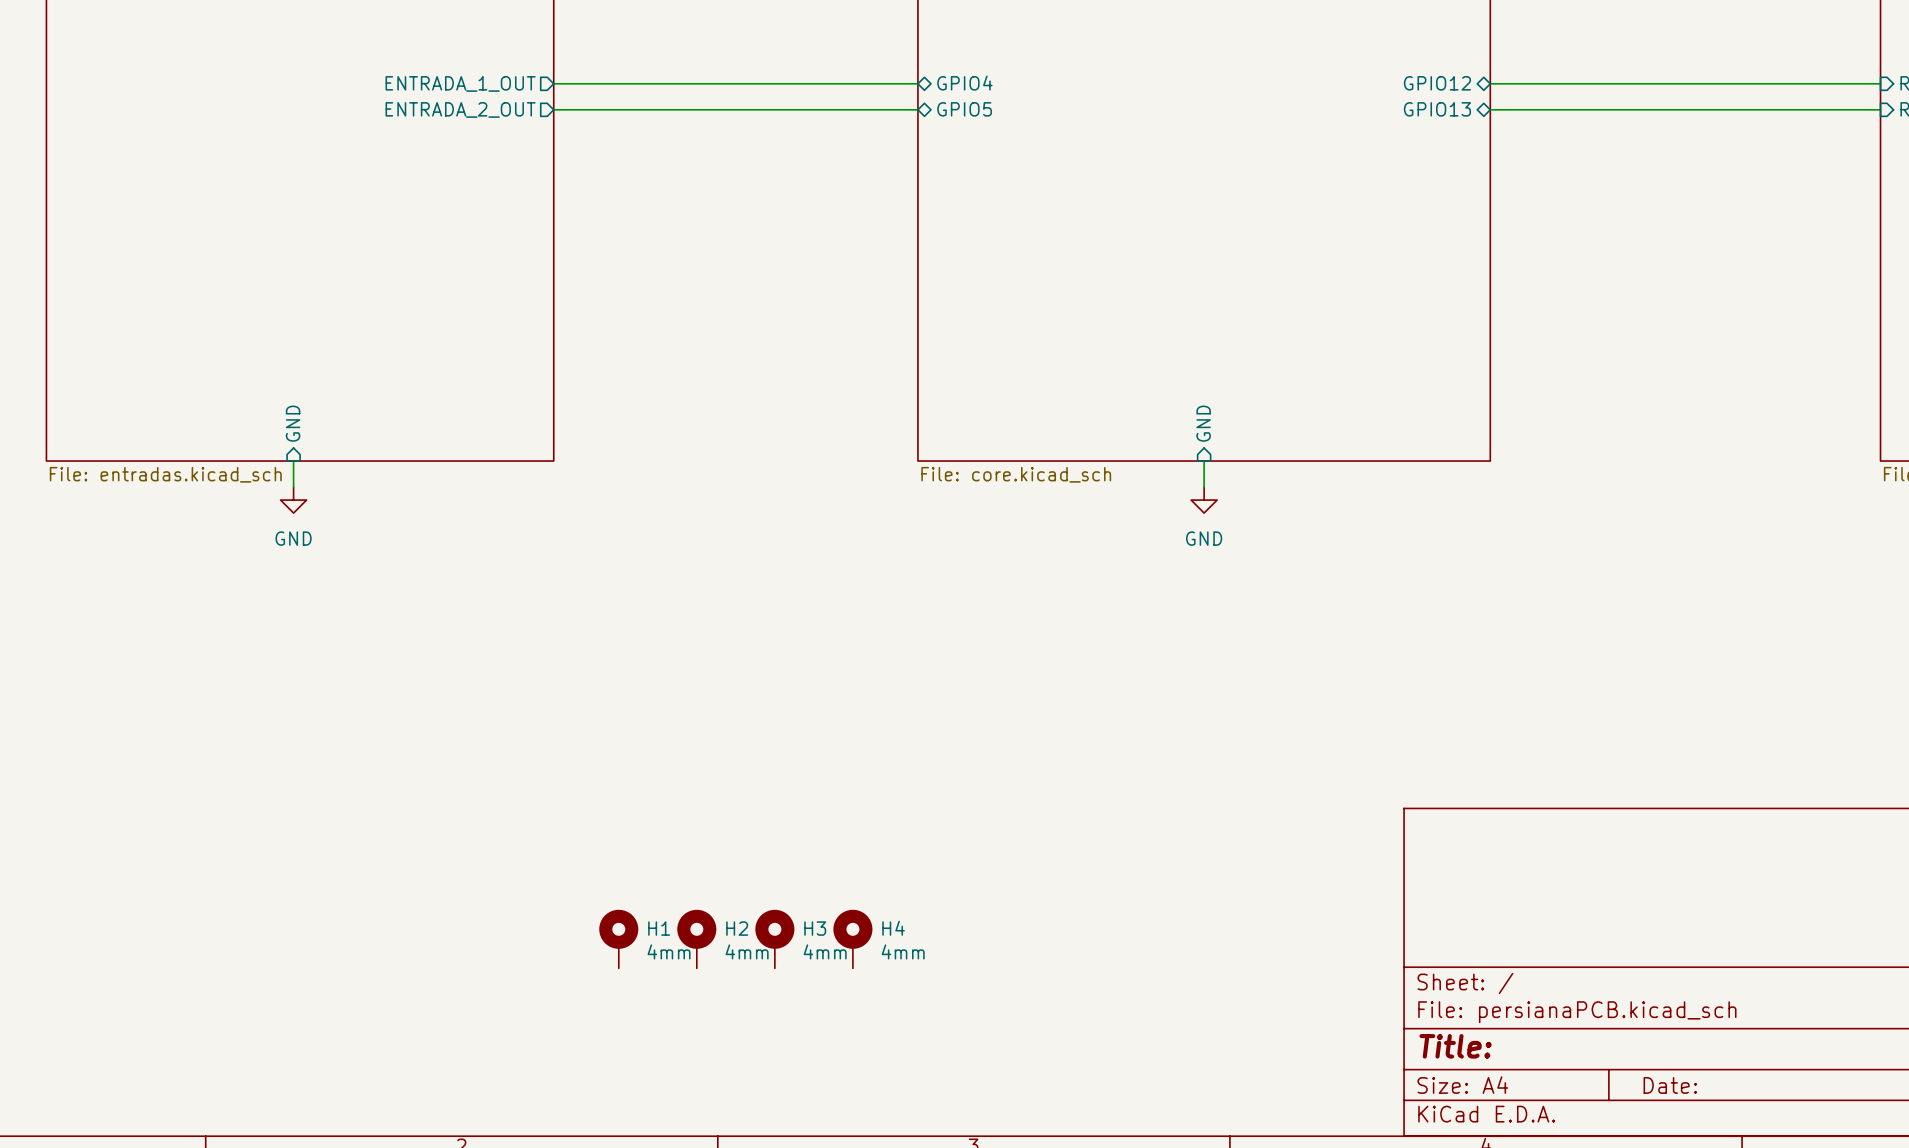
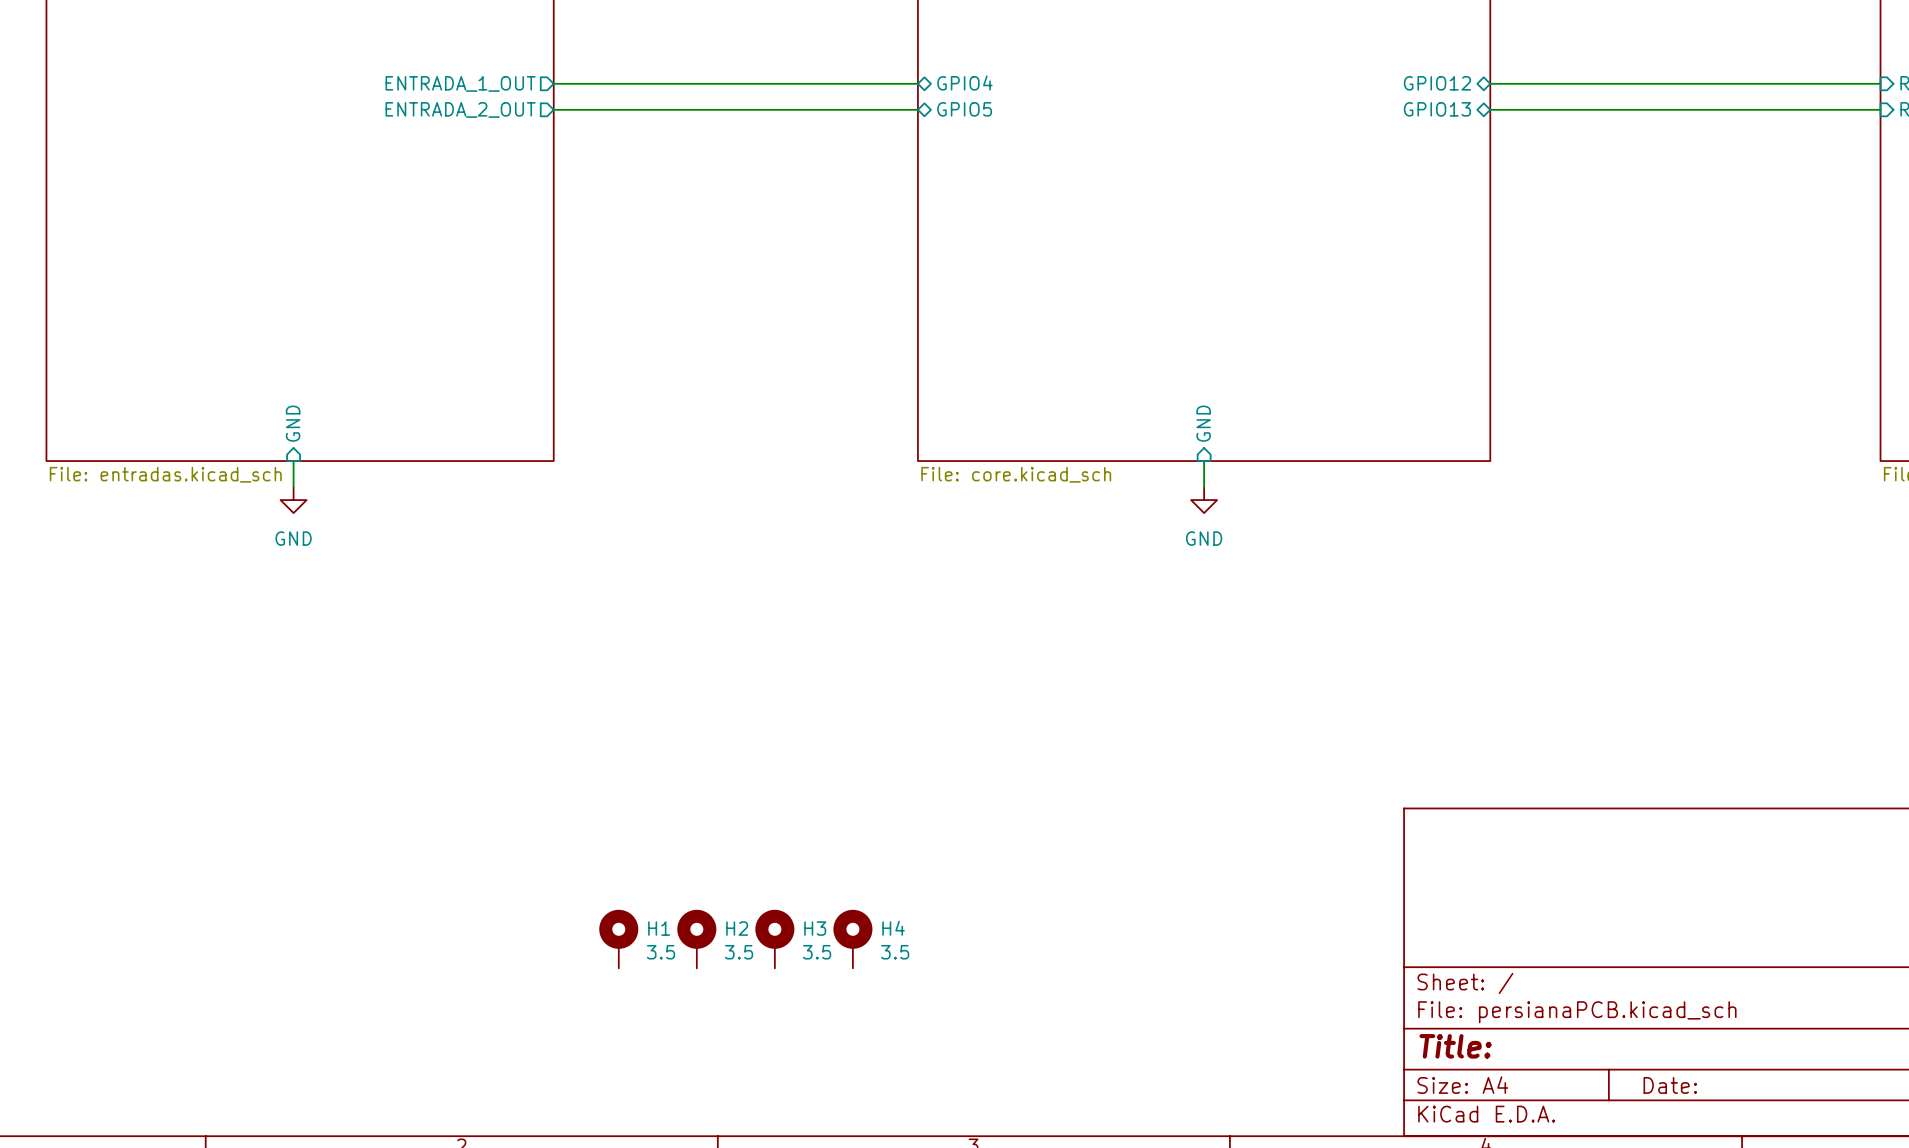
H1 value: 4mm (669, 951) -> 3.5 (660, 952)
H2 value: 4mm (747, 951) -> 3.5 (739, 952)
H3 value: 4mm (825, 951) -> 3.5 (817, 952)
H4 value: 4mm (903, 951) -> 3.5 (895, 952)

